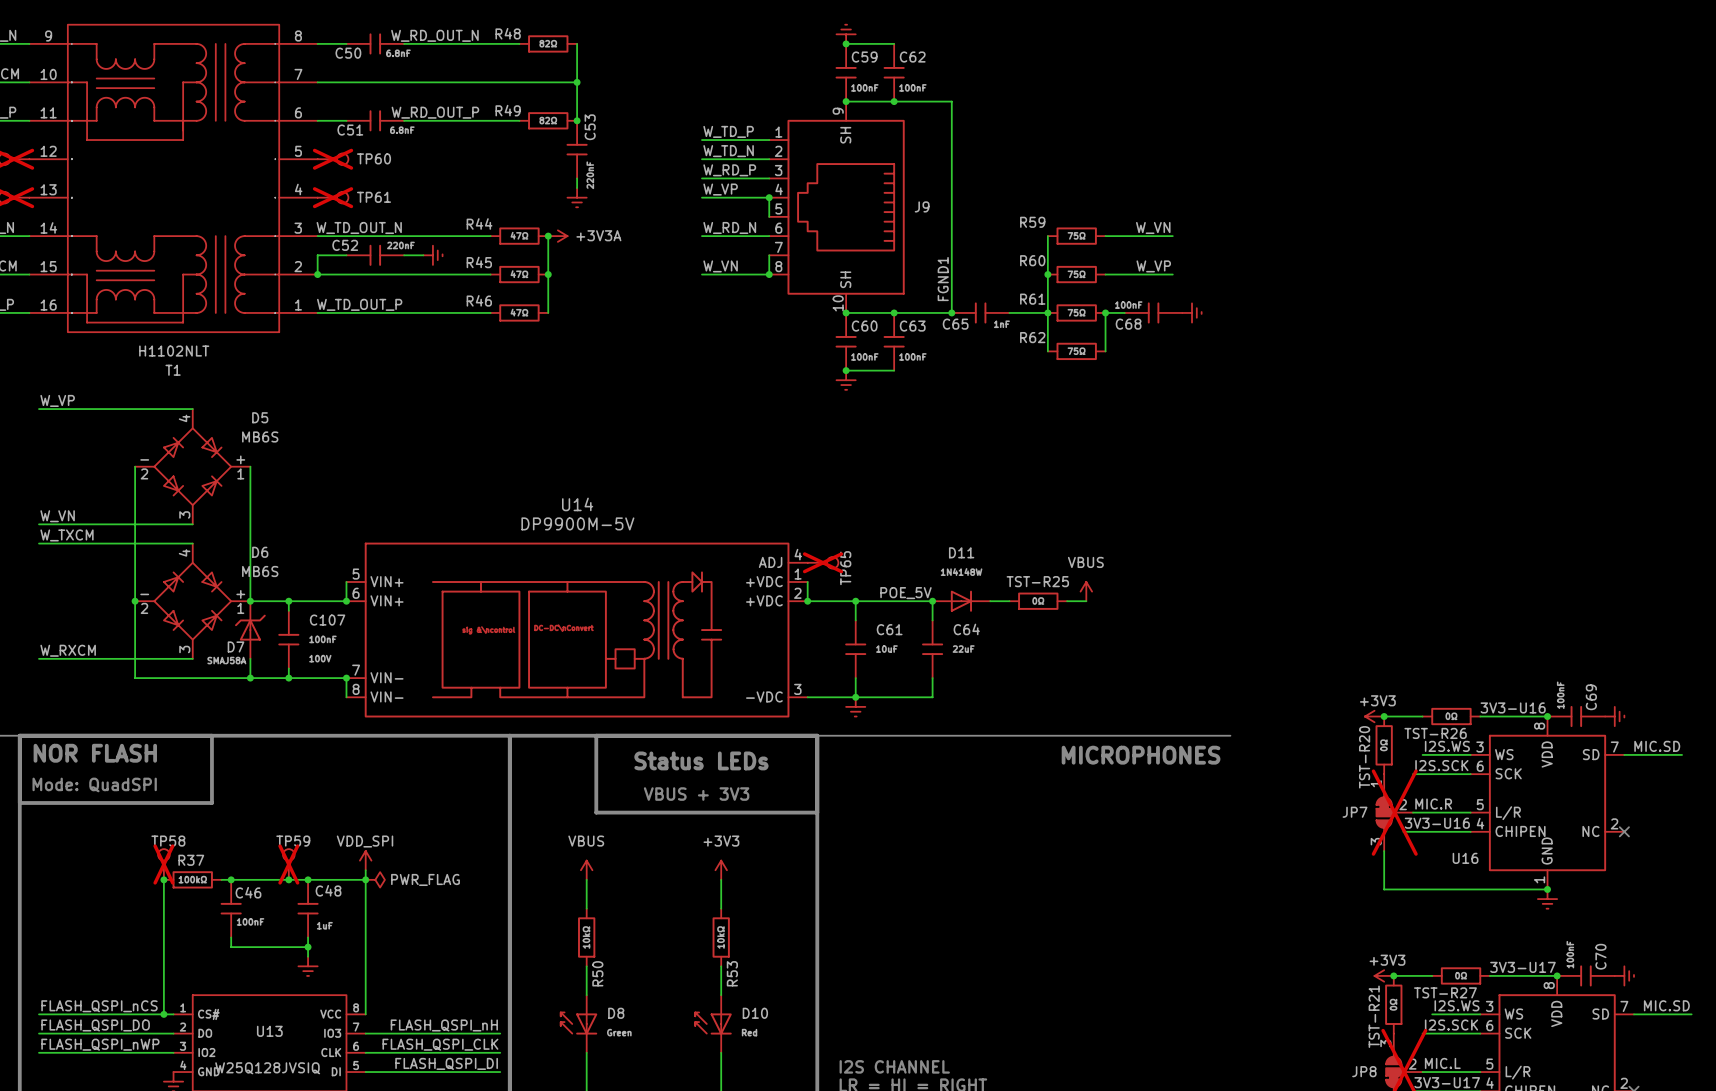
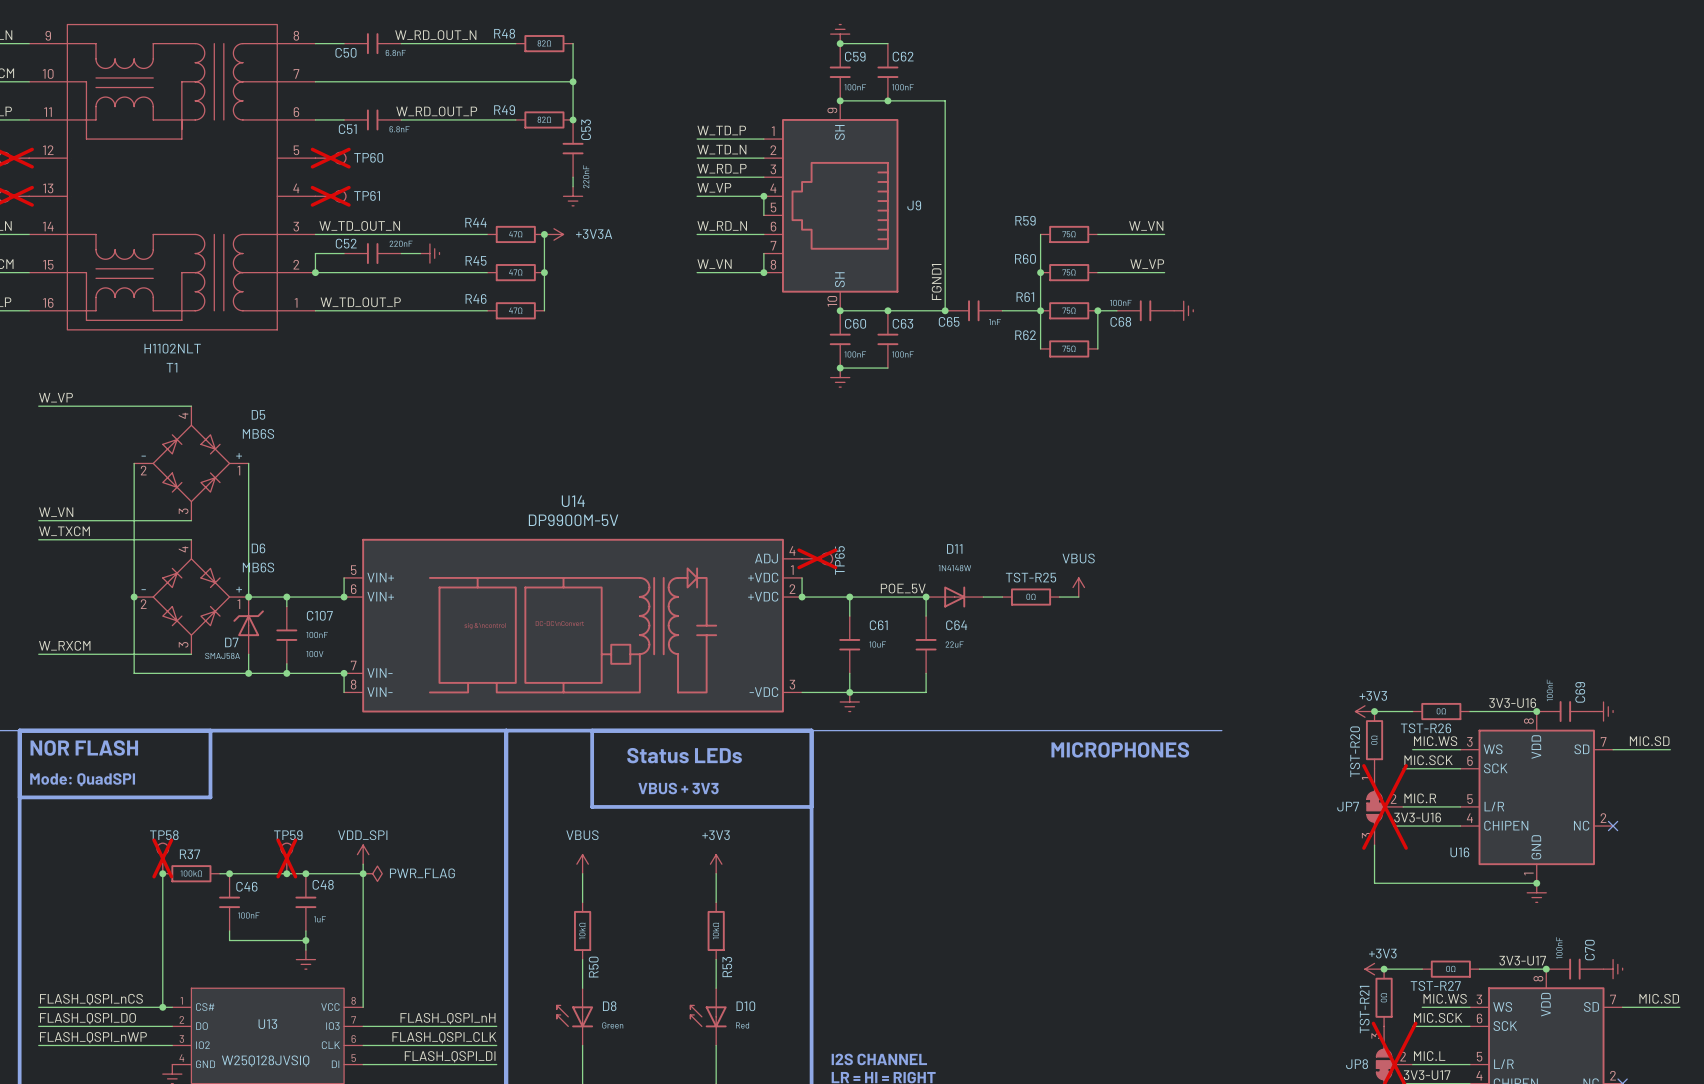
label: I2S.WS (1447, 746) -> MIC.WS (1435, 741)
label: I2S.SCK (1441, 765) -> MIC.SCK (1428, 760)
label: I2S.WS (1456, 1005) -> MIC.WS (1445, 998)
label: I2S.SCK (1451, 1025) -> MIC.SCK (1438, 1017)

